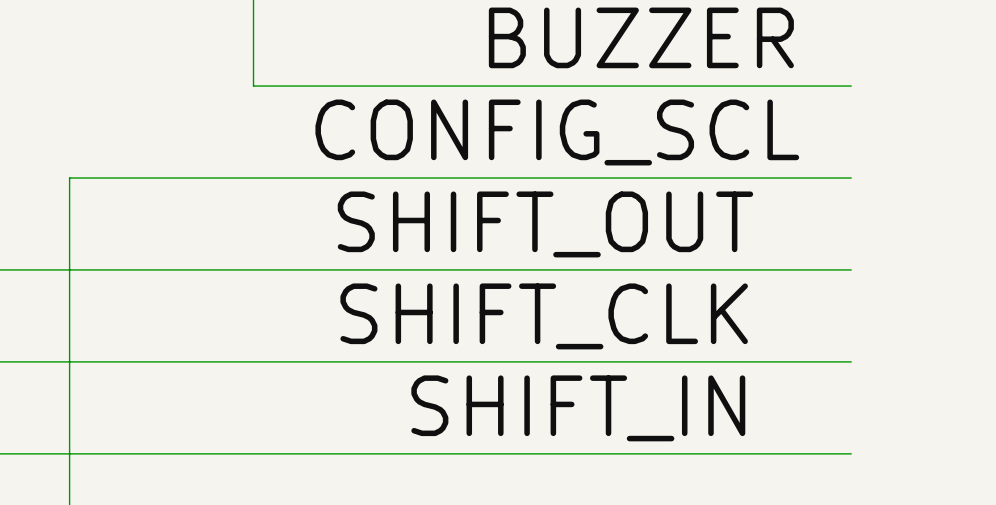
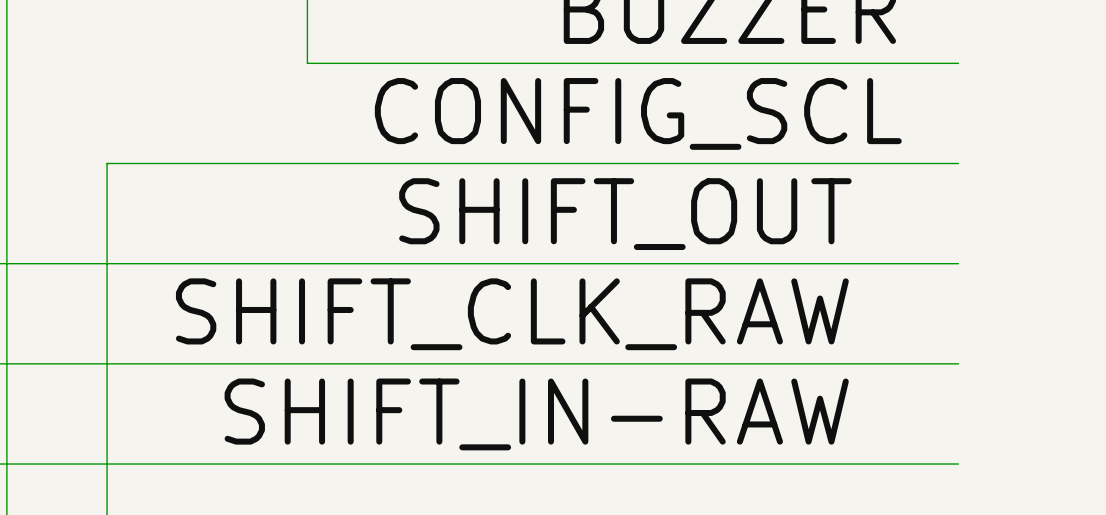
label: SHIFT_CLK (544, 316) -> SHIFT_CLK_RAW (512, 314)
label: SHIFT_IN (578, 408) -> SHIFT_IN-RAW (536, 414)

